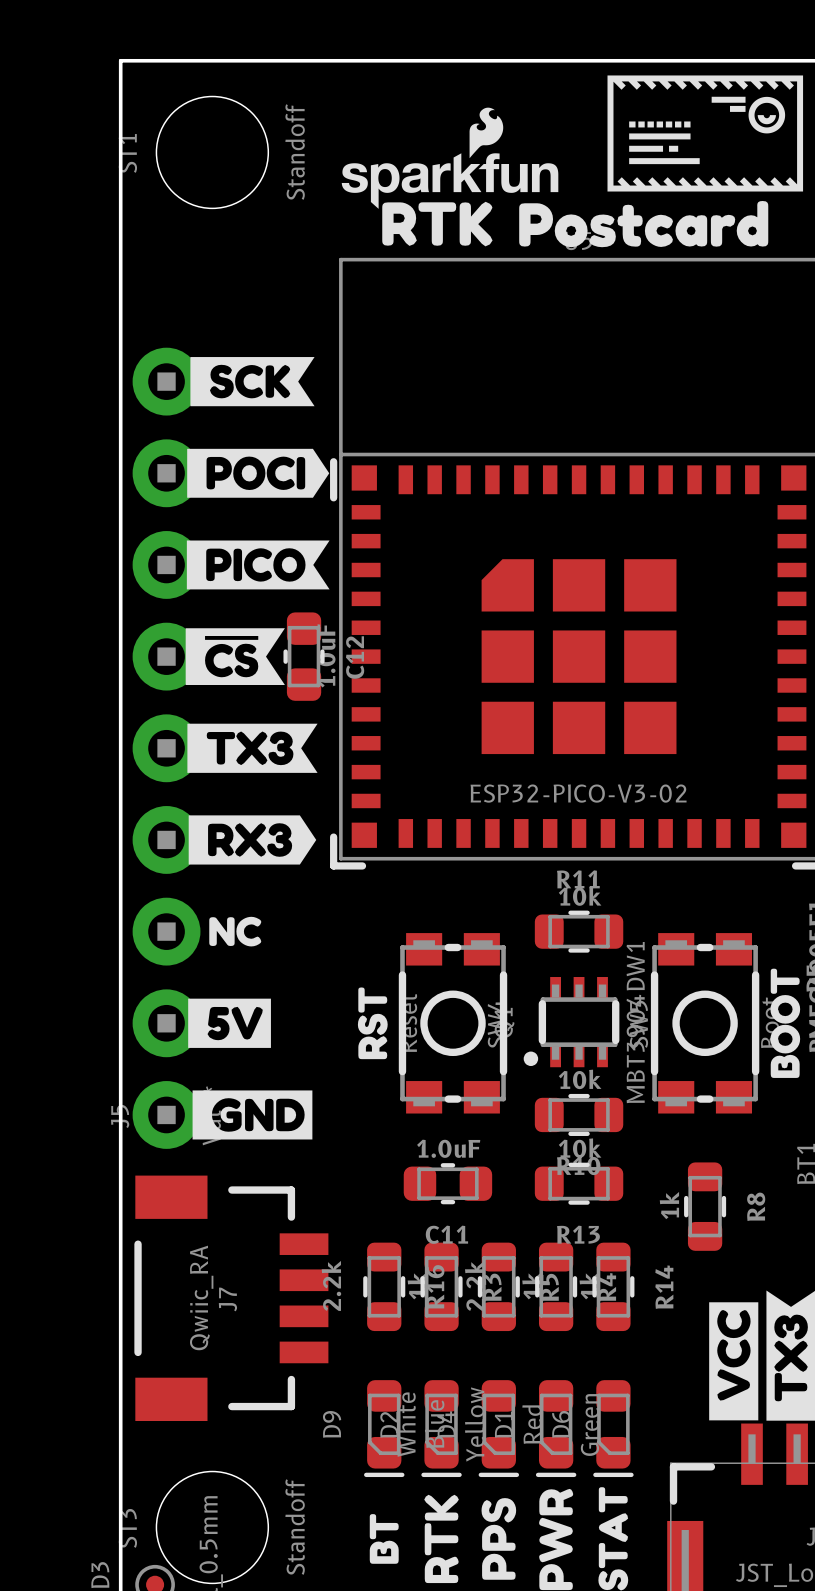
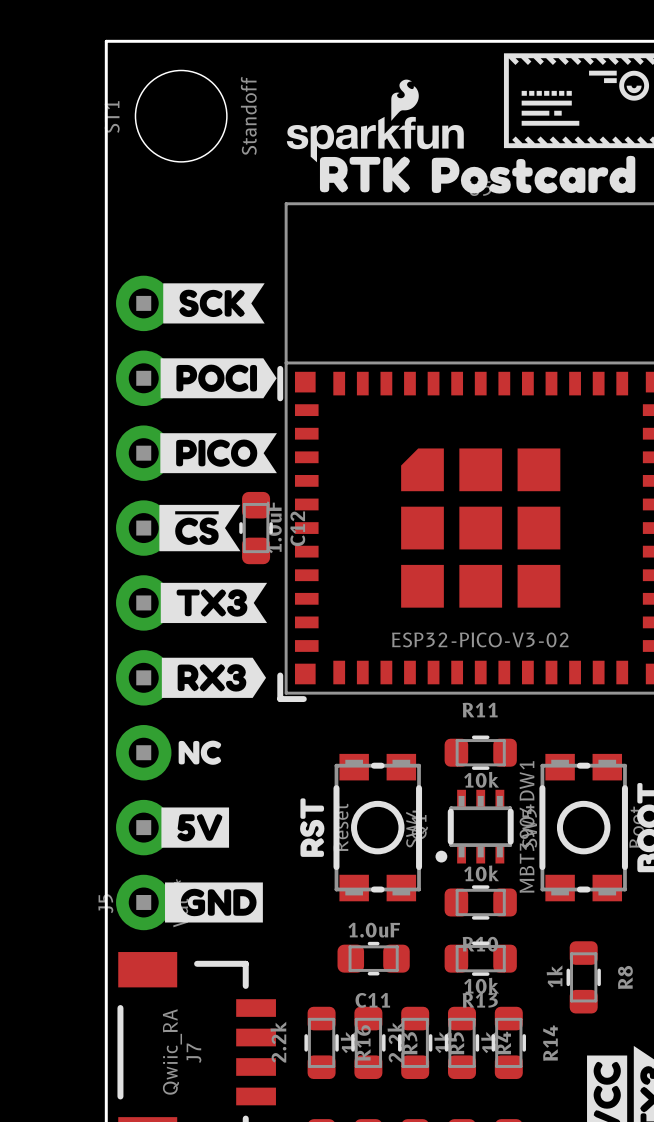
R11 value position: 10k (580, 896) -> 10k (481, 779)
R13 value position: 10k (580, 1148) -> 10k (481, 985)

